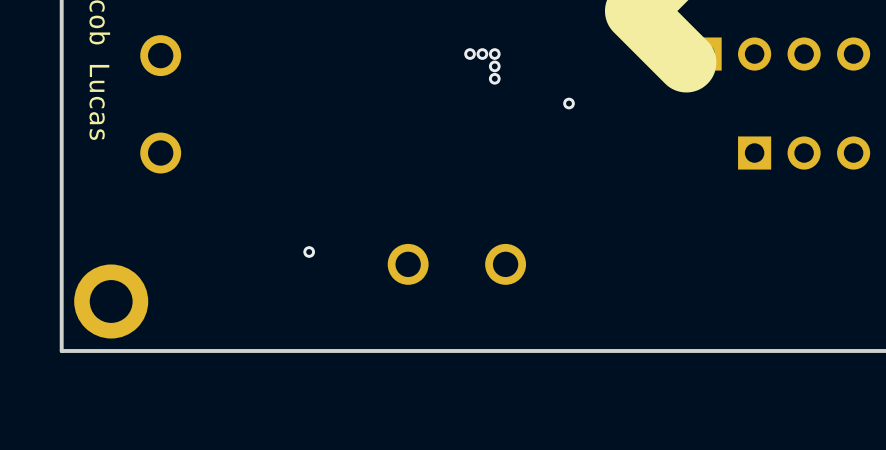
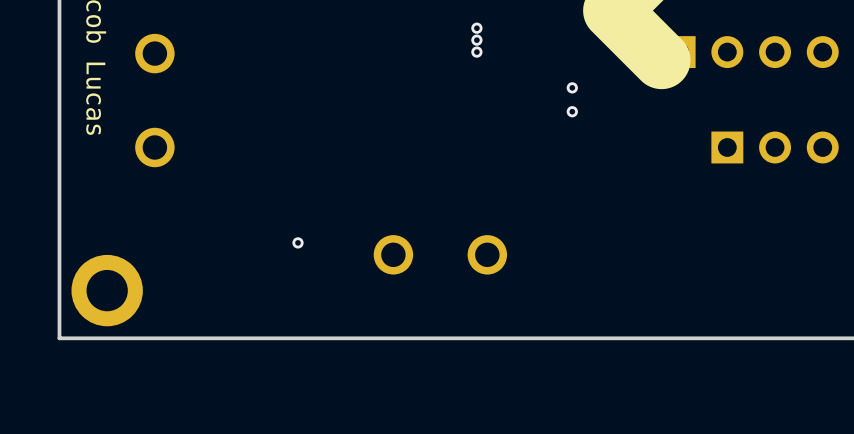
via: none -> (476, 28)
via: none -> (476, 40)
via: (470, 54) -> none
via: (482, 54) -> none
via: (494, 66) -> none
via: (494, 78) -> none
via: none -> (572, 87)
via: (569, 103) -> none
via: none -> (572, 111)

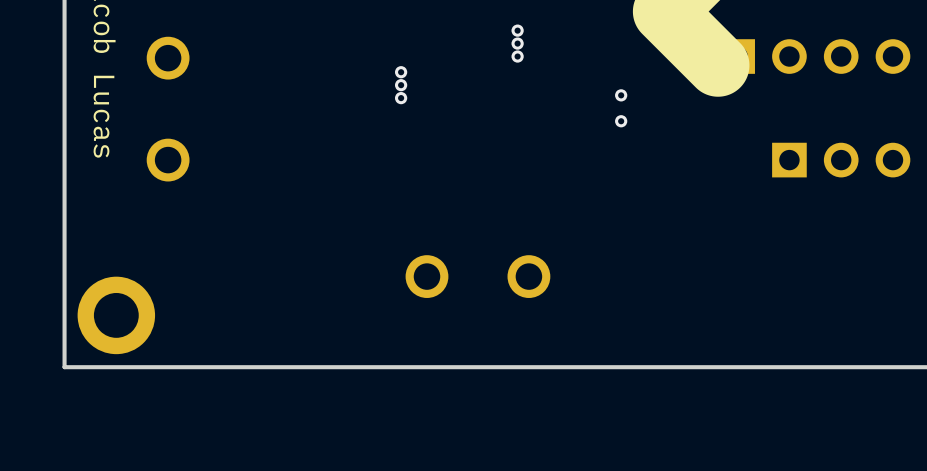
via: none -> (401, 72)
via: none -> (401, 85)
via: none -> (401, 98)
via: (298, 242) -> none

